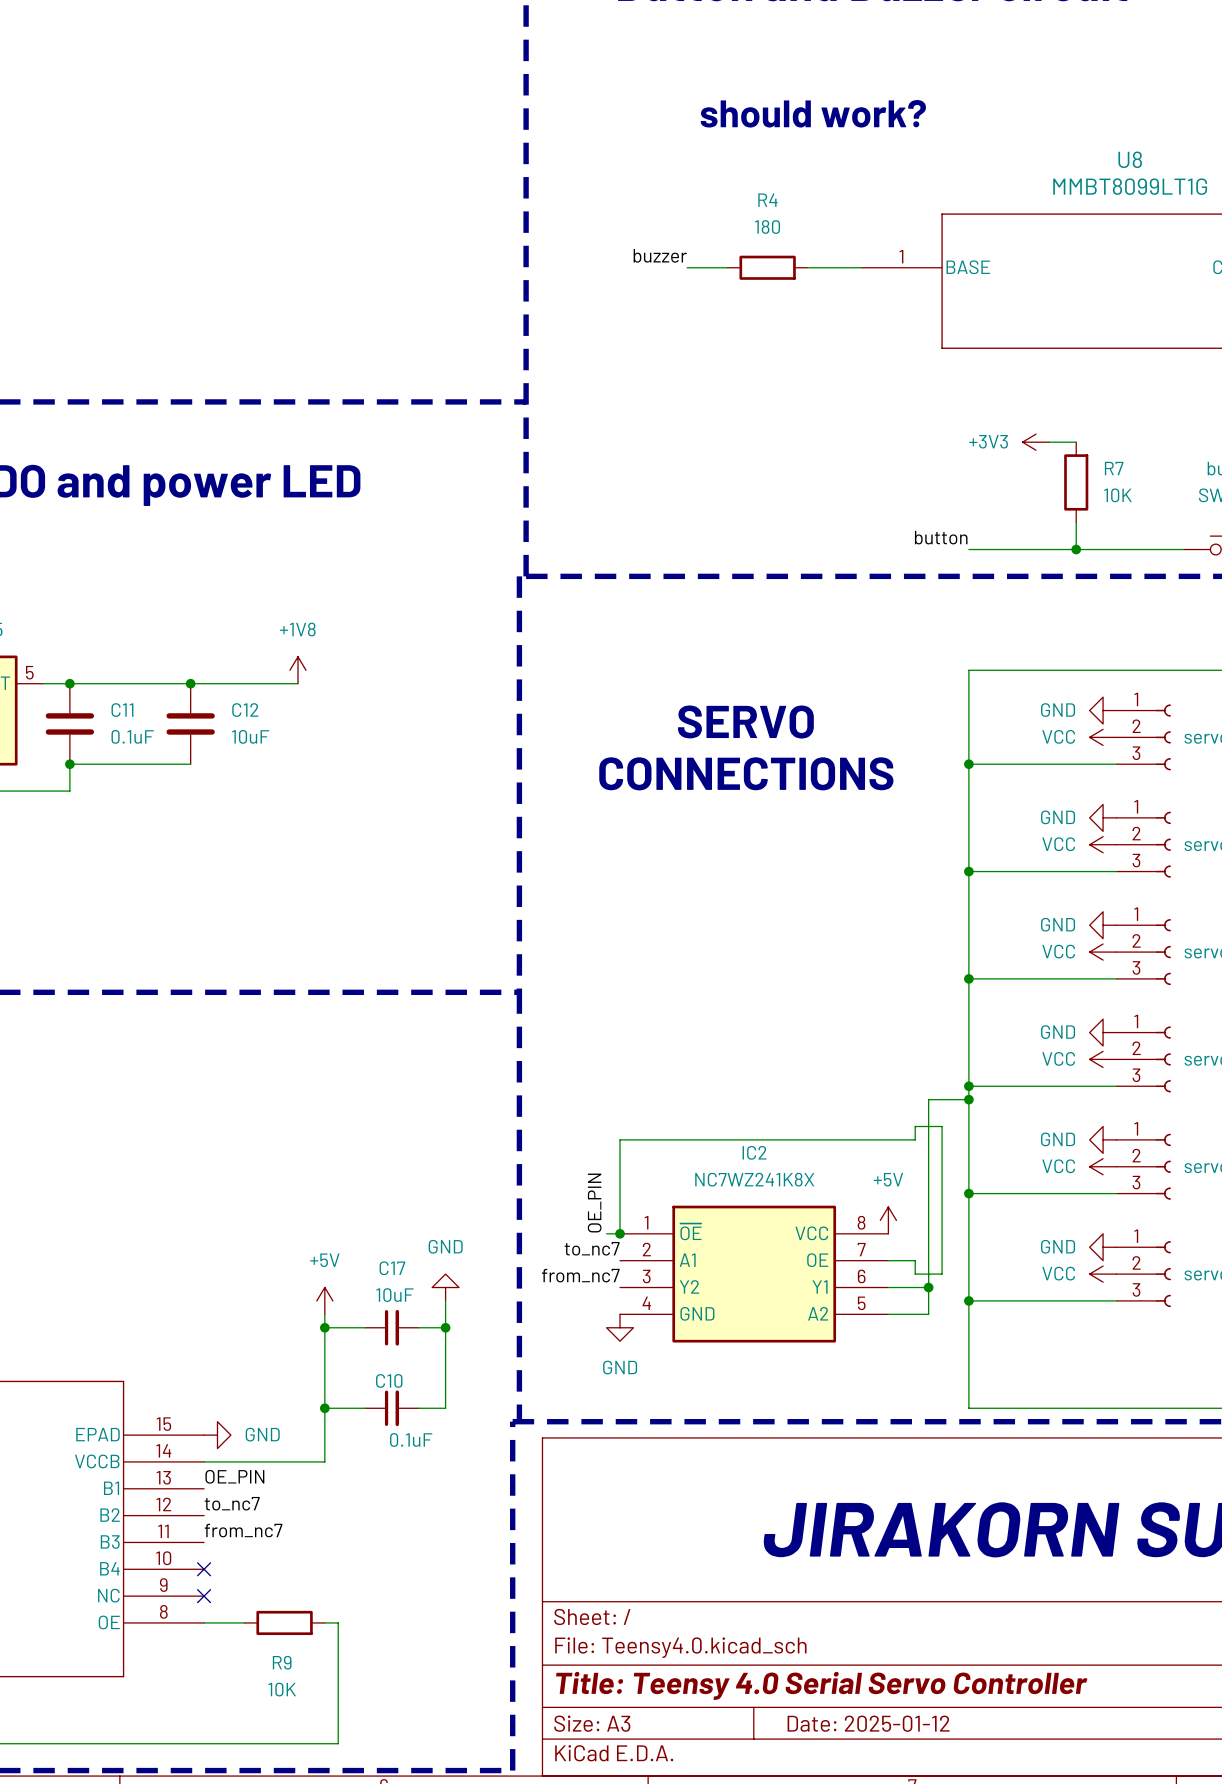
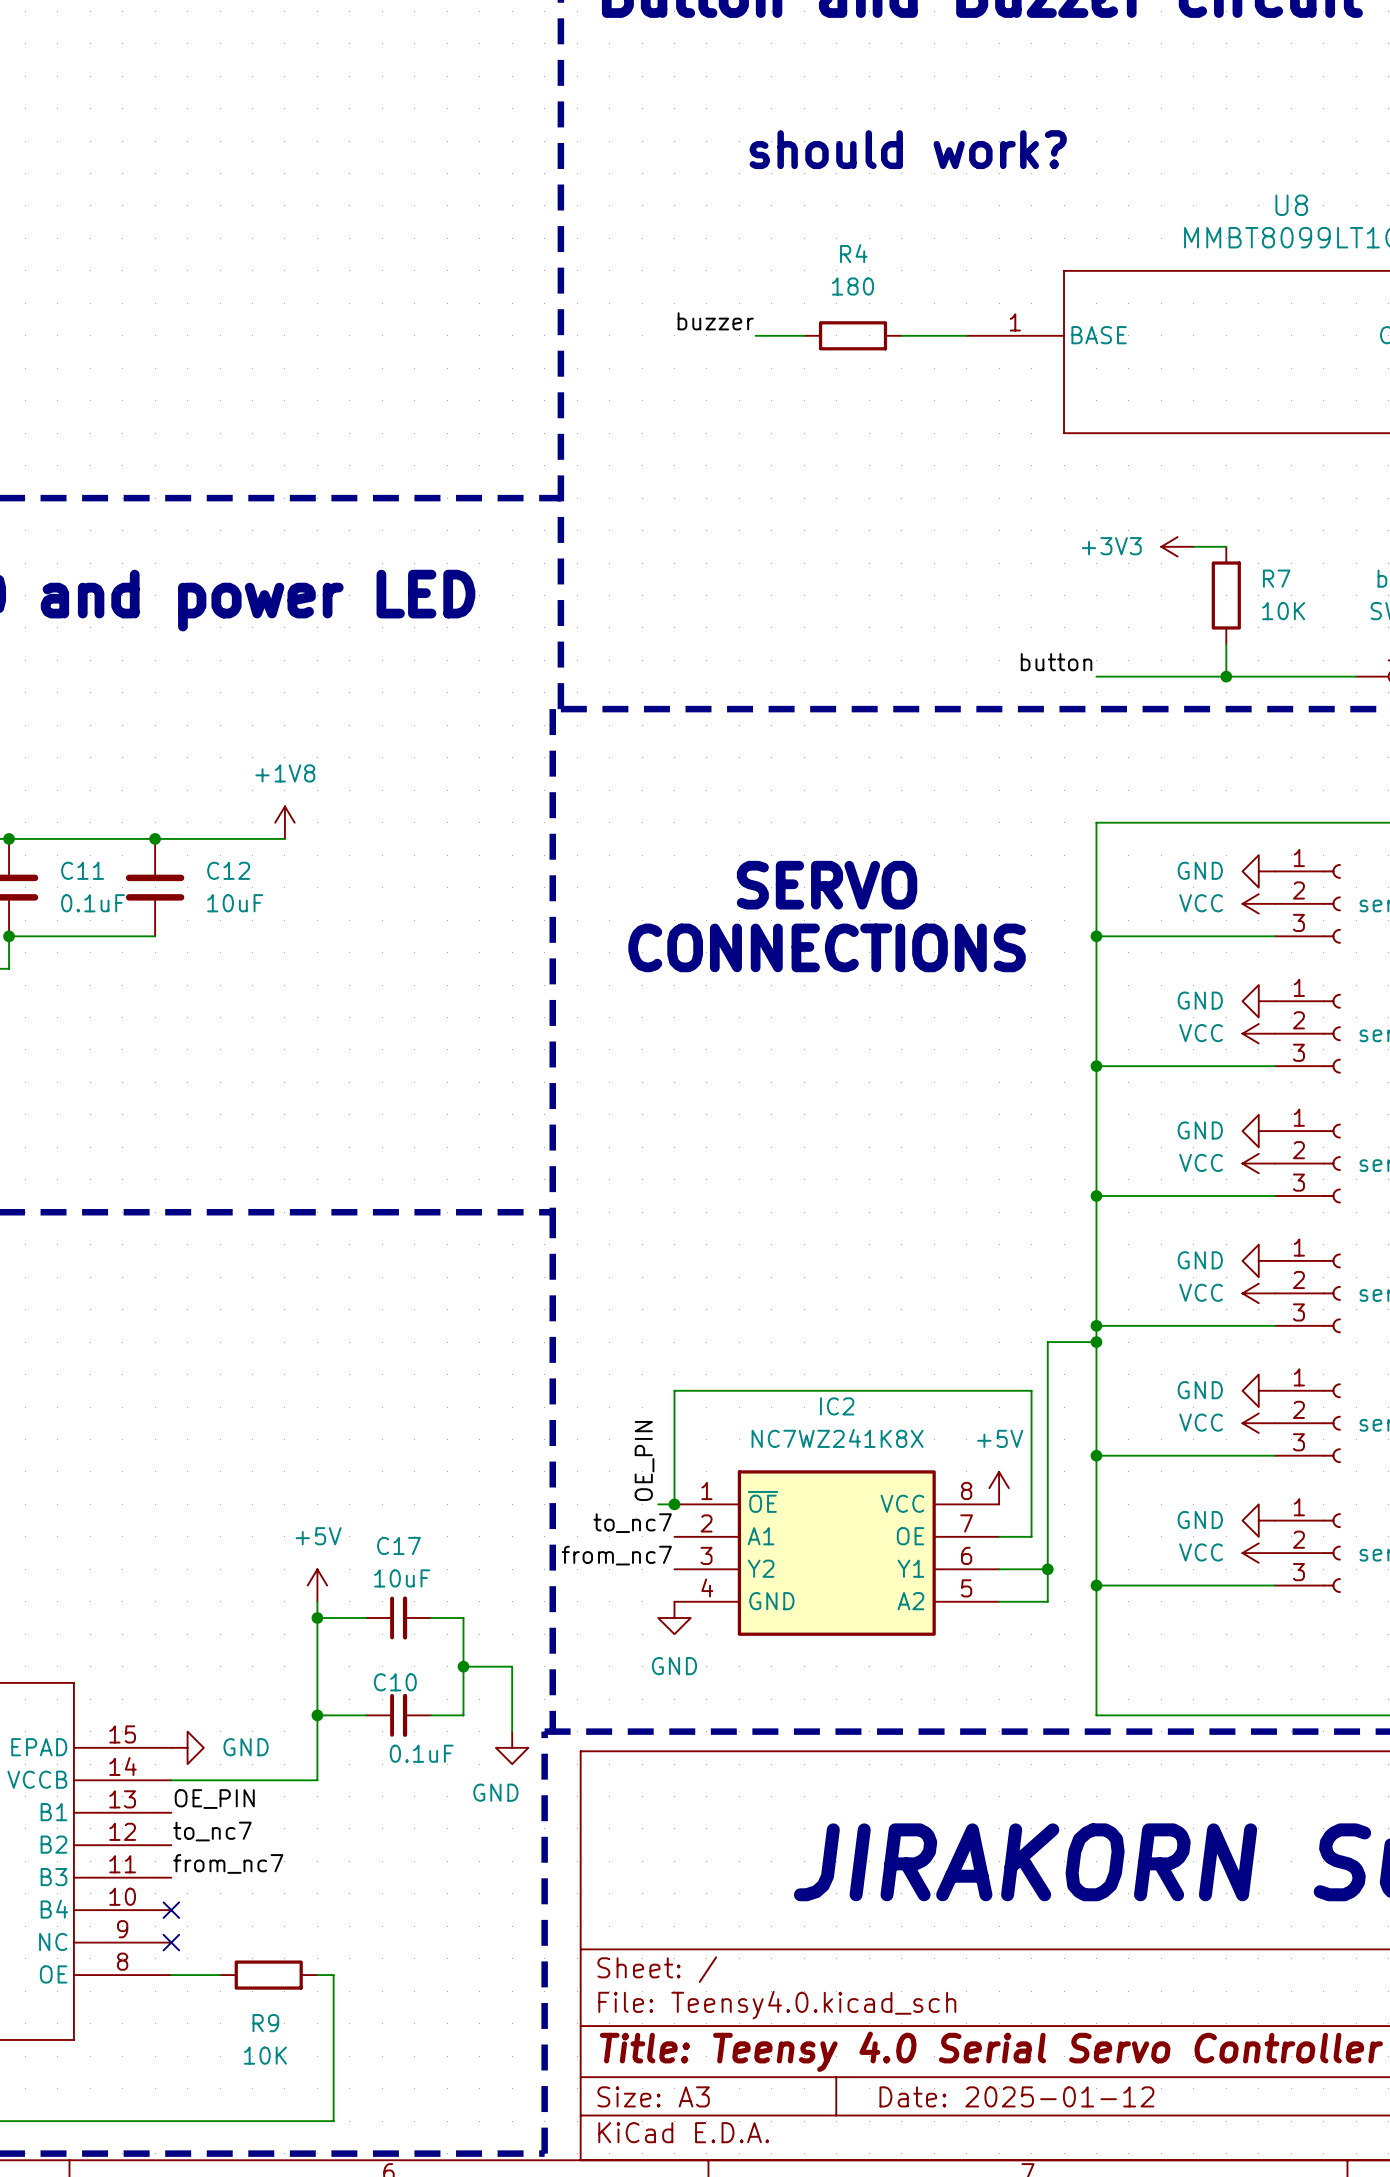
wire: (915, 1139) (915, 1126) (942, 1126) (942, 1274) (915, 1274) (915, 1260) -> (1031, 1390) (1031, 1536)
power symbol rotation: 0° (445, 1287) -> 180° (512, 1747)
power symbol position: GND (445, 1287) -> GND (512, 1747)
wire: (445, 1300) (445, 1327) -> none
junction position: (445, 1327) -> (463, 1666)
wire: none -> (463, 1666) (512, 1666) (512, 1731)

